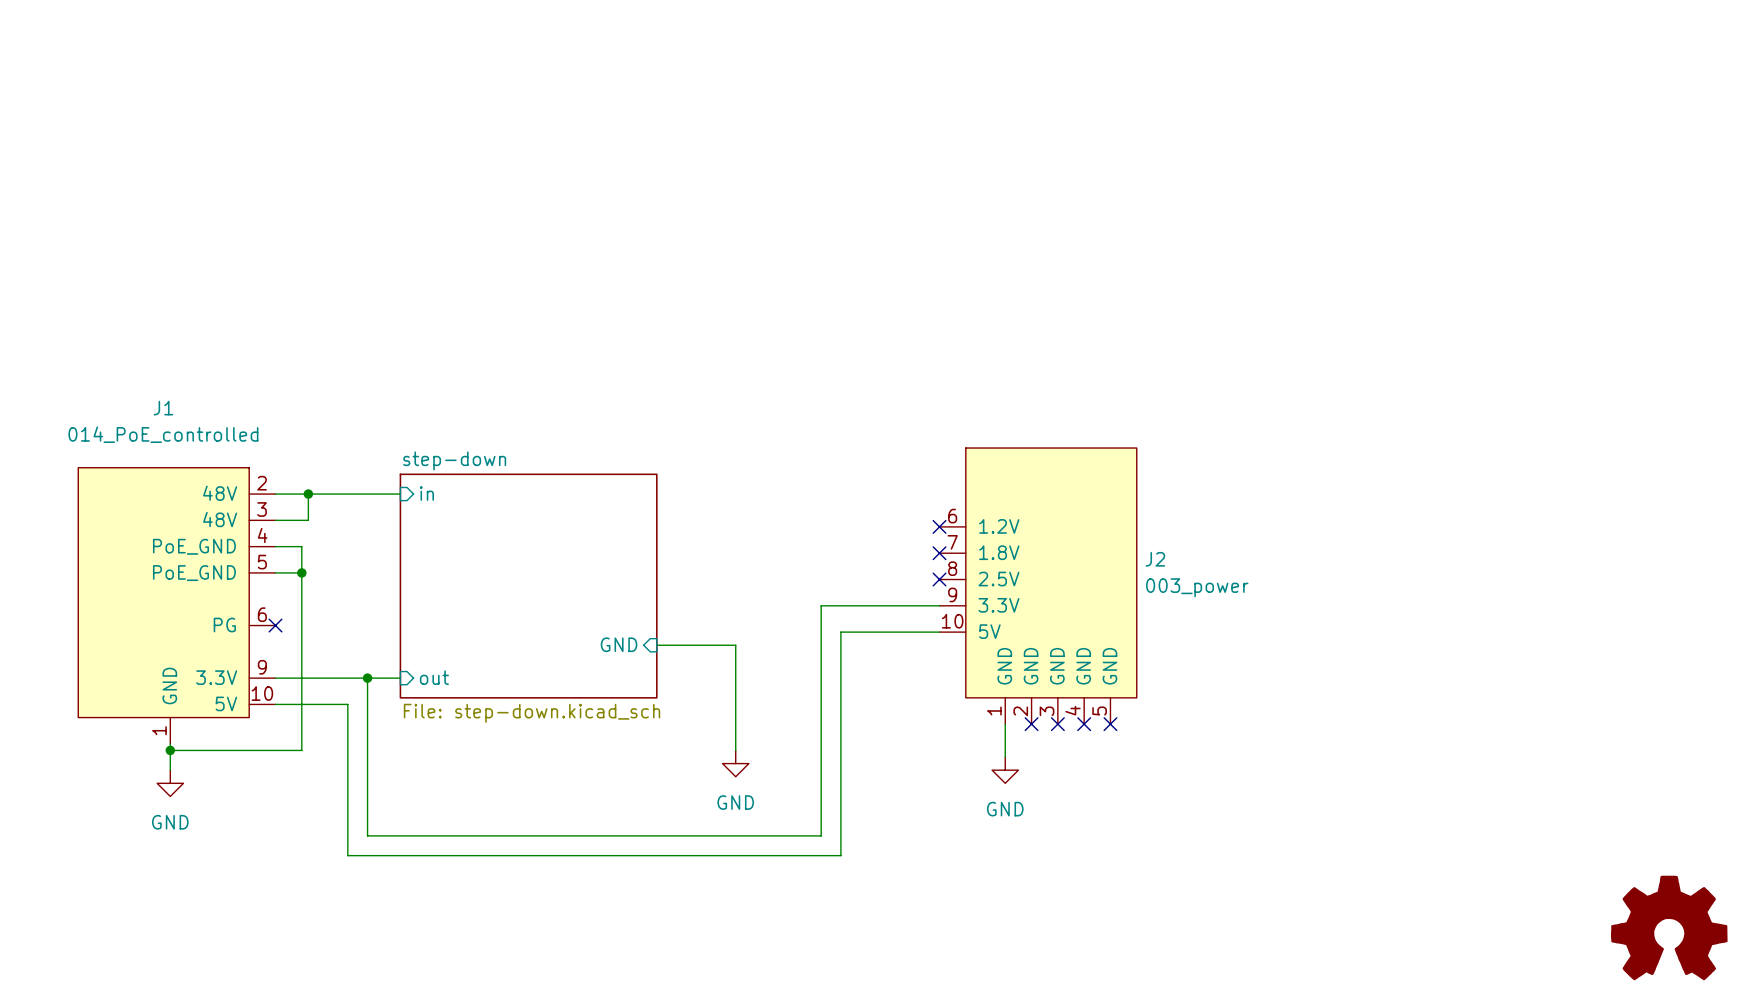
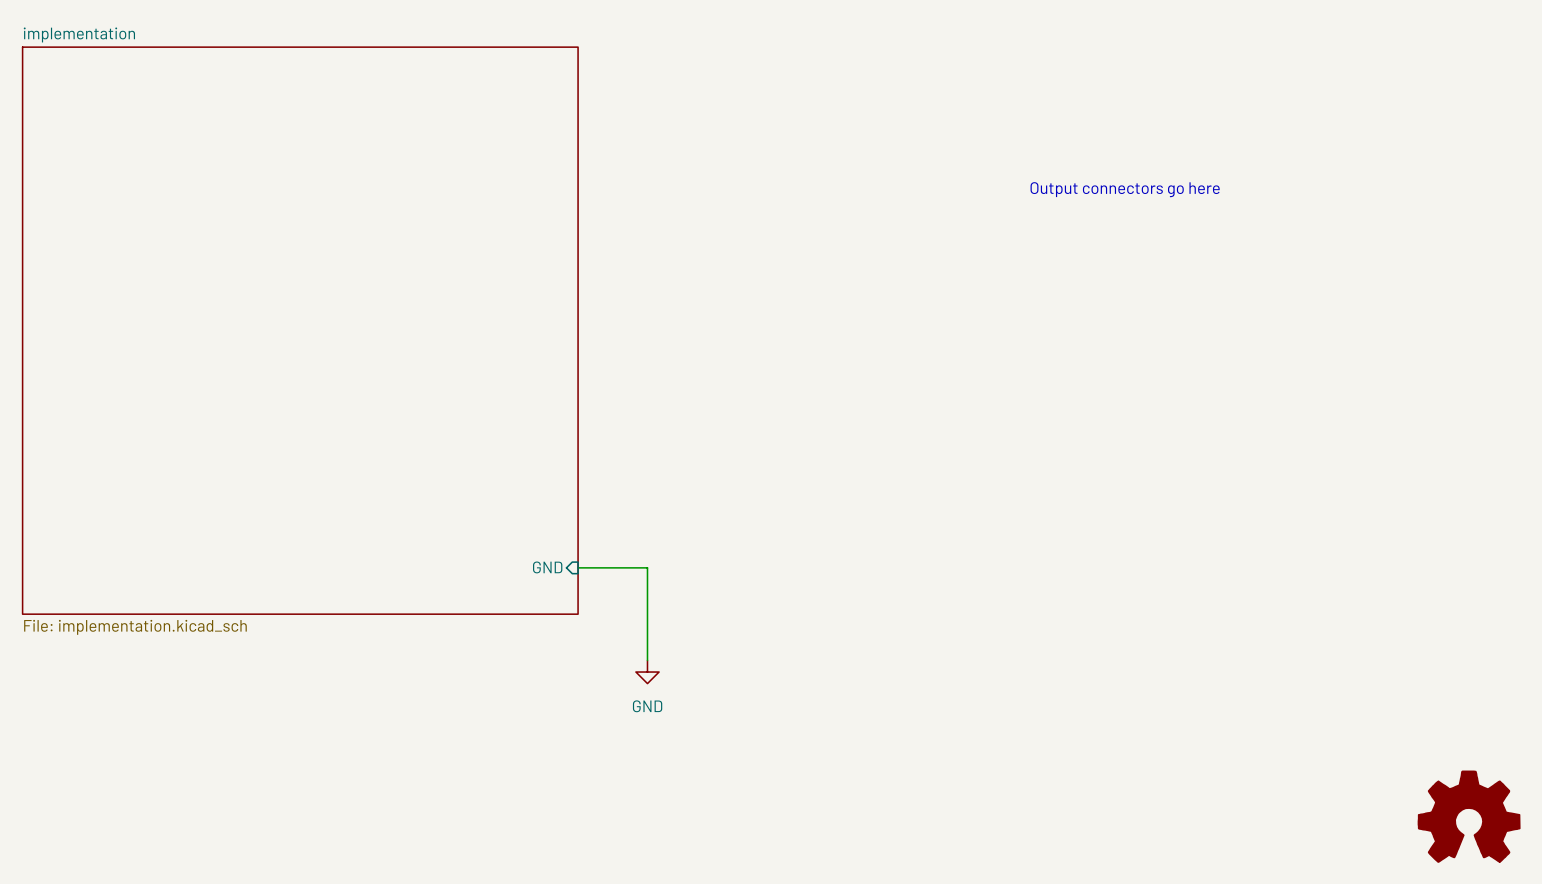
text: none -> Output connectors go here (1125, 189)
sheet implementation: none -> File: implementation.kicad_sch (300, 330)
sheet pin: in (426, 493) -> none
wire: (275, 494) (400, 494) -> none
wire: (308, 494) (308, 520) (275, 520) -> none
junction: (308, 494) -> none
no-connect mark: (939, 526) -> none
wire: (275, 546) (301, 546) (301, 750) (170, 750) -> none
no-connect mark: (939, 553) -> none
wire: (275, 572) (301, 572) -> none
junction: (301, 572) -> none
no-connect mark: (939, 579) -> none
sheet step-down: File: step-down.kicad_sch (528, 586) -> none
J2: 003_power (1038, 586) -> none
J1: 014_PoE_controlled (176, 605) -> none
wire: (939, 605) (821, 605) (821, 835) (367, 835) (367, 678) -> none
no-connect mark: (275, 625) -> none
wire: (939, 632) (840, 632) (840, 855) (347, 855) (347, 704) (275, 704) -> none
sheet pin: out (434, 677) -> none
wire: (275, 678) (400, 678) -> none
junction: (367, 678) -> none
wire: (1005, 724) (1005, 757) -> none
no-connect mark: (1031, 724) -> none
no-connect mark: (1057, 724) -> none
no-connect mark: (1084, 724) -> none
no-connect mark: (1110, 724) -> none
wire: (170, 743) (170, 770) -> none
junction: (170, 750) -> none
power symbol: GND (1005, 770) -> none
power symbol: GND (170, 783) -> none

